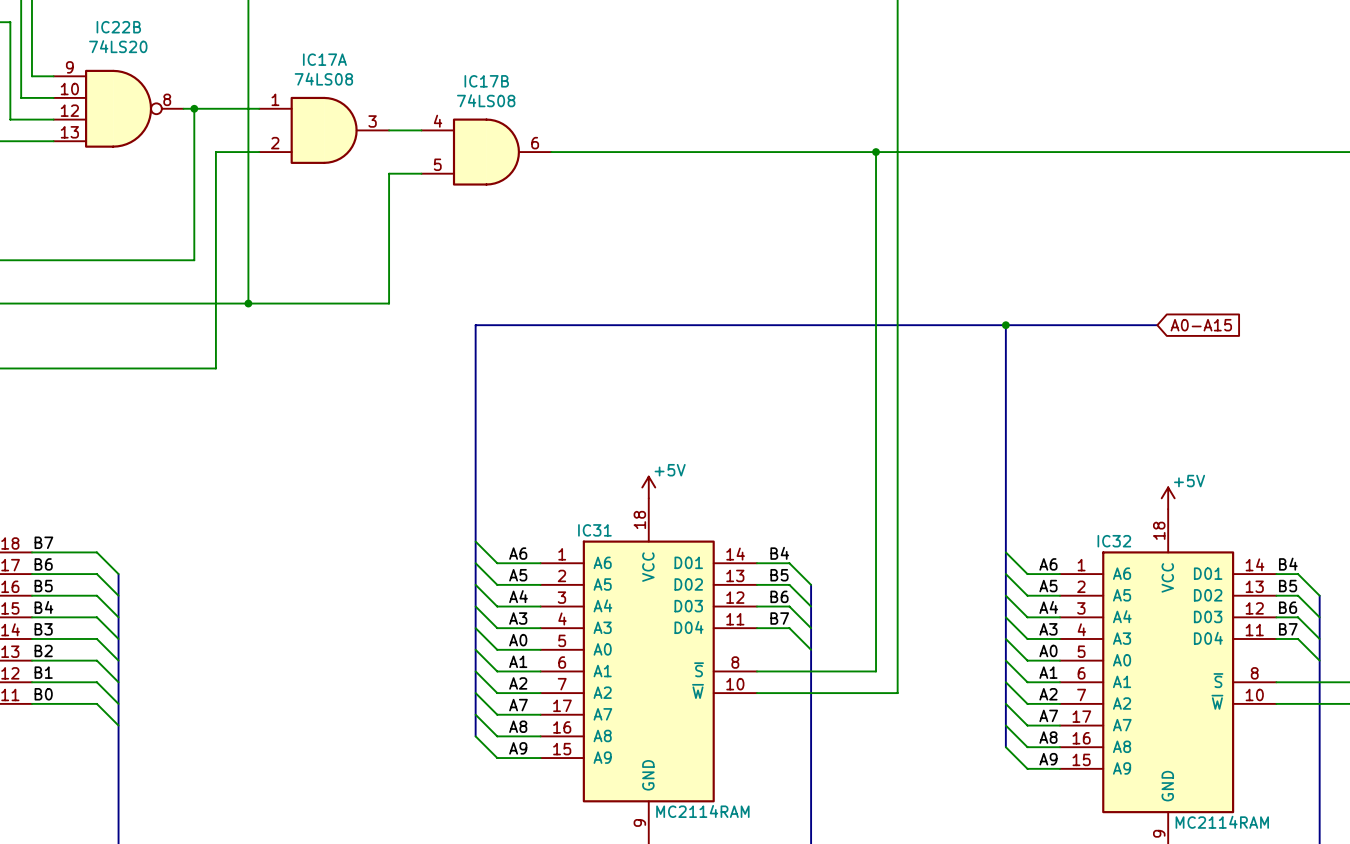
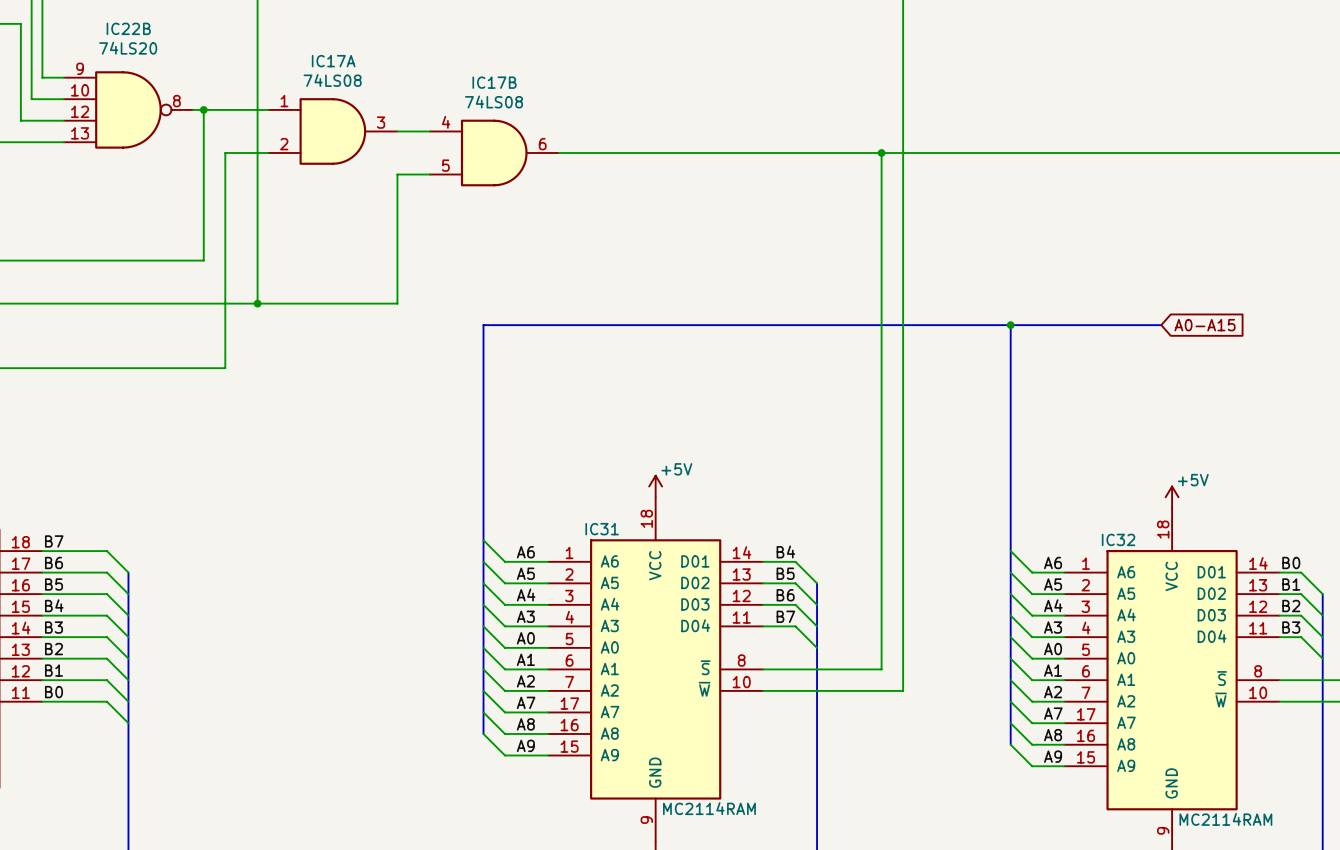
label: B4 (1288, 564) -> B0 (1291, 562)
label: B5 (1288, 586) -> B1 (1291, 584)
label: B6 (1288, 607) -> B2 (1291, 606)
label: B7 (1288, 629) -> B3 (1291, 627)

